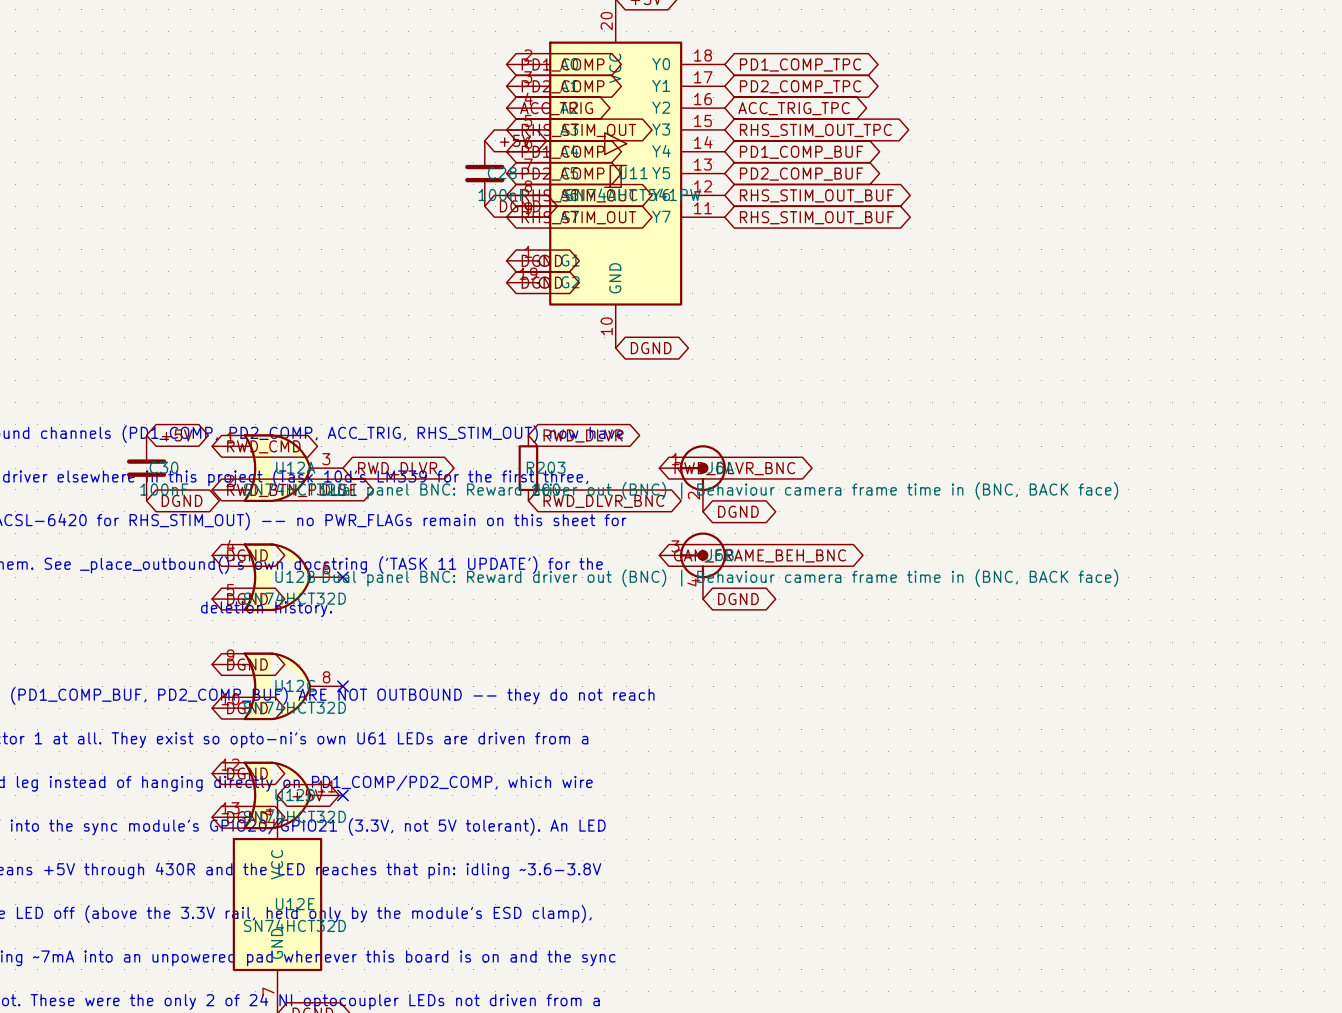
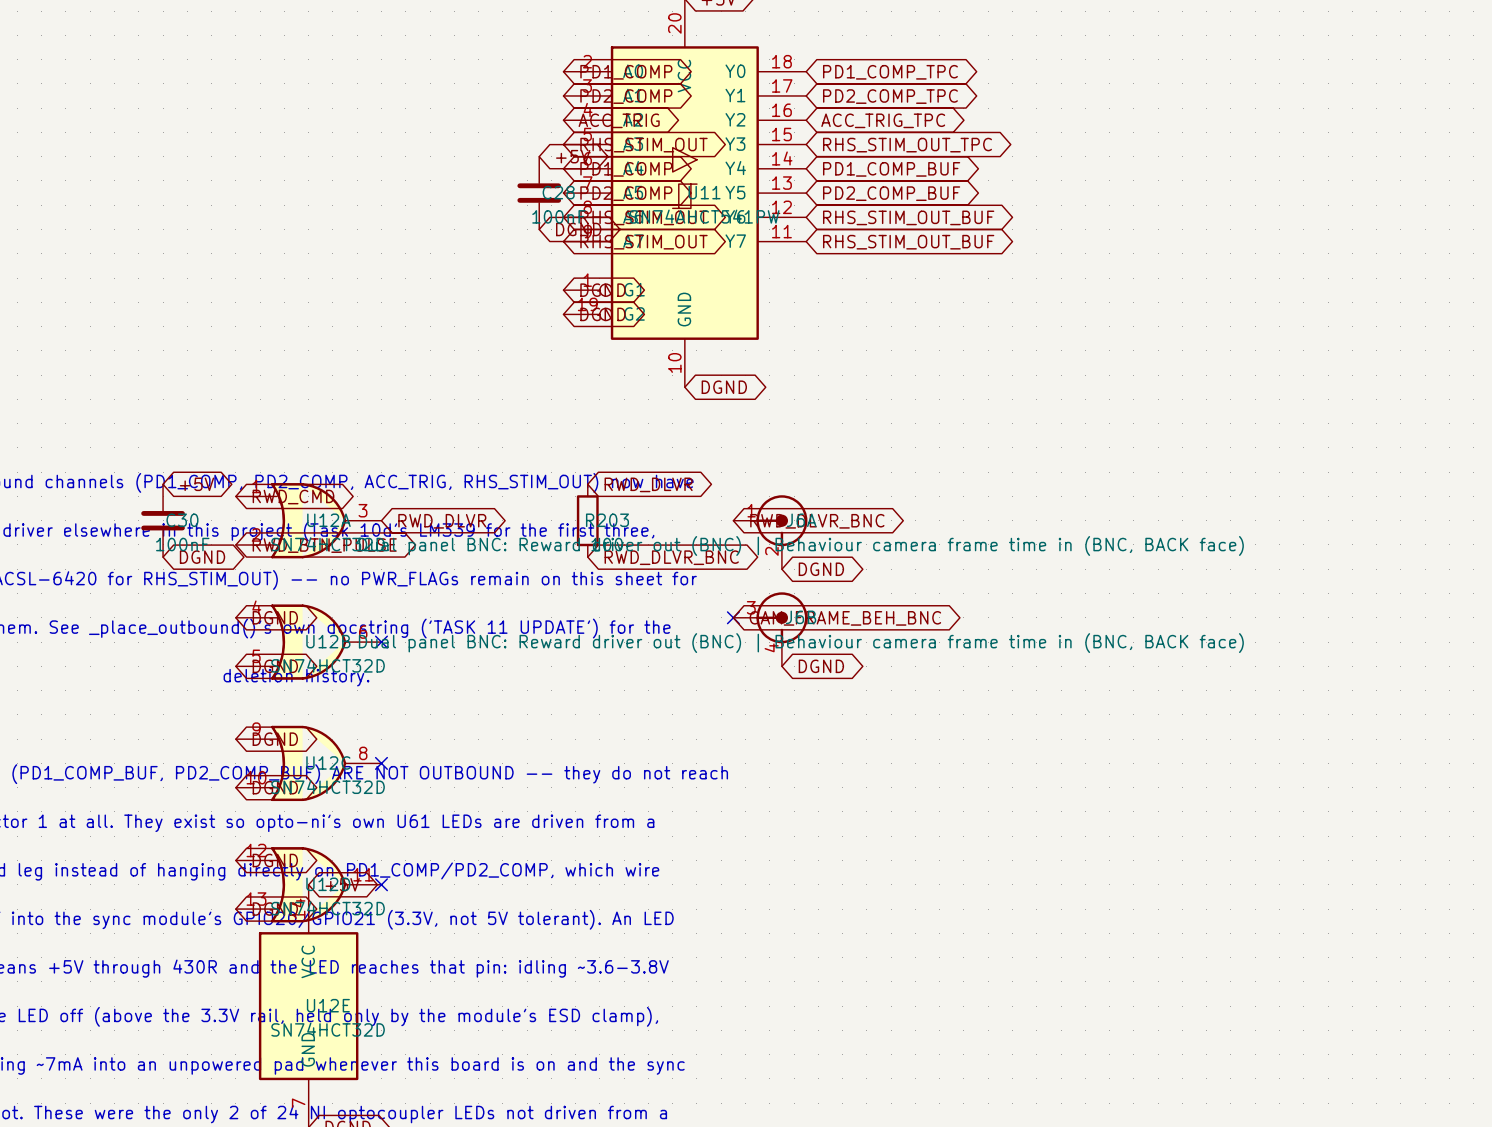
no-connect mark: none -> (733, 617)

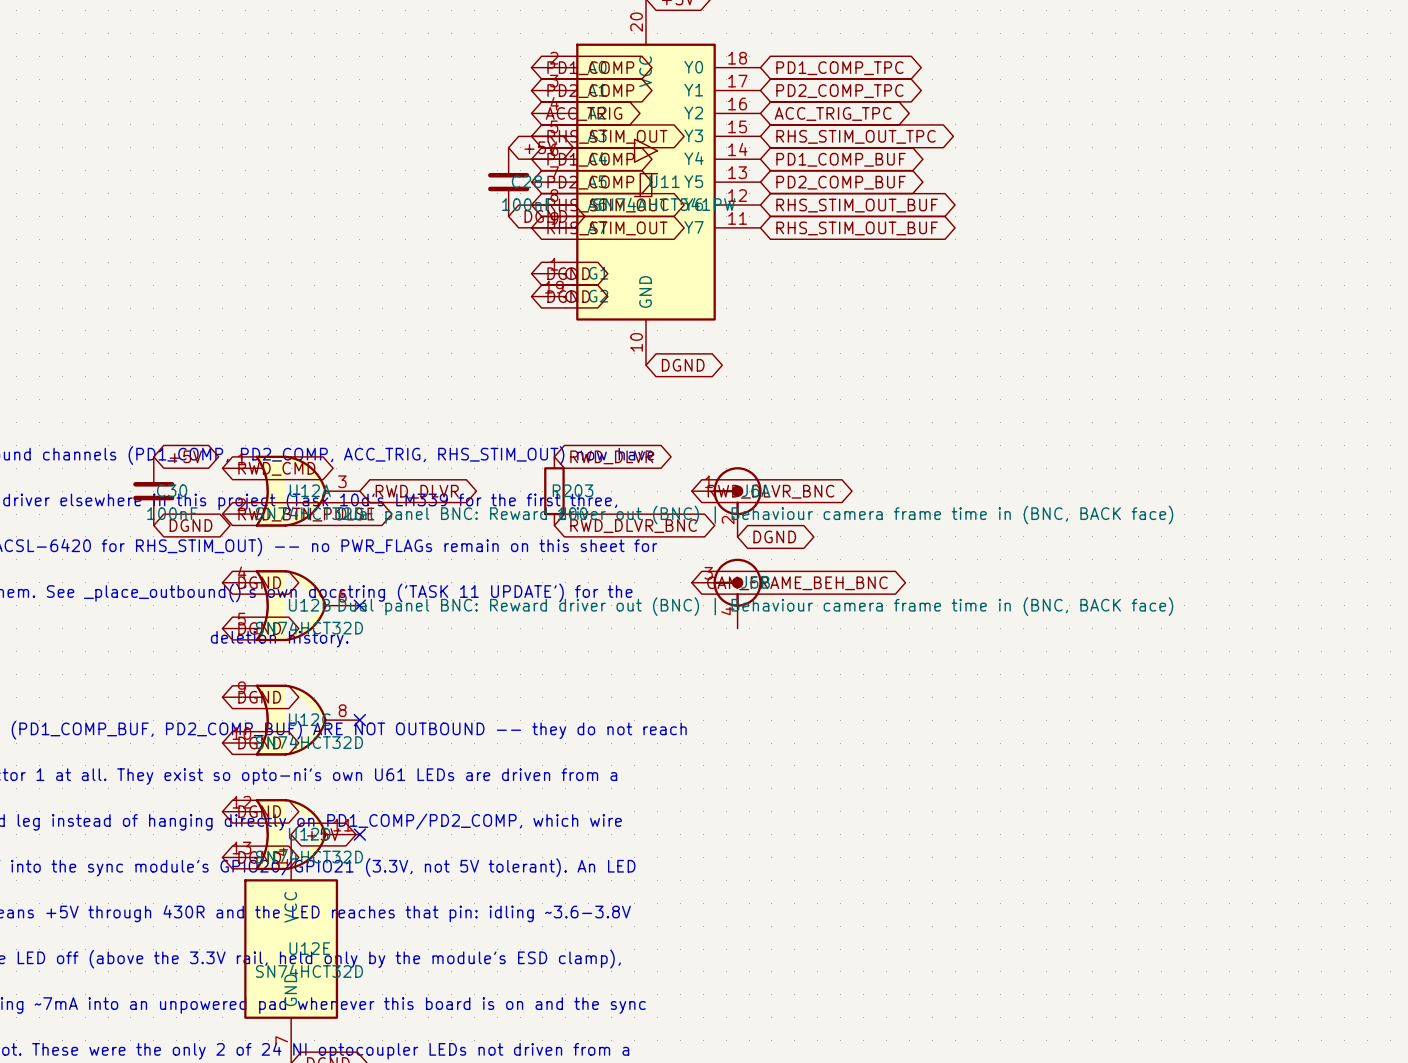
no-connect mark: (733, 617) -> none
global label: DGND (821, 666) -> none

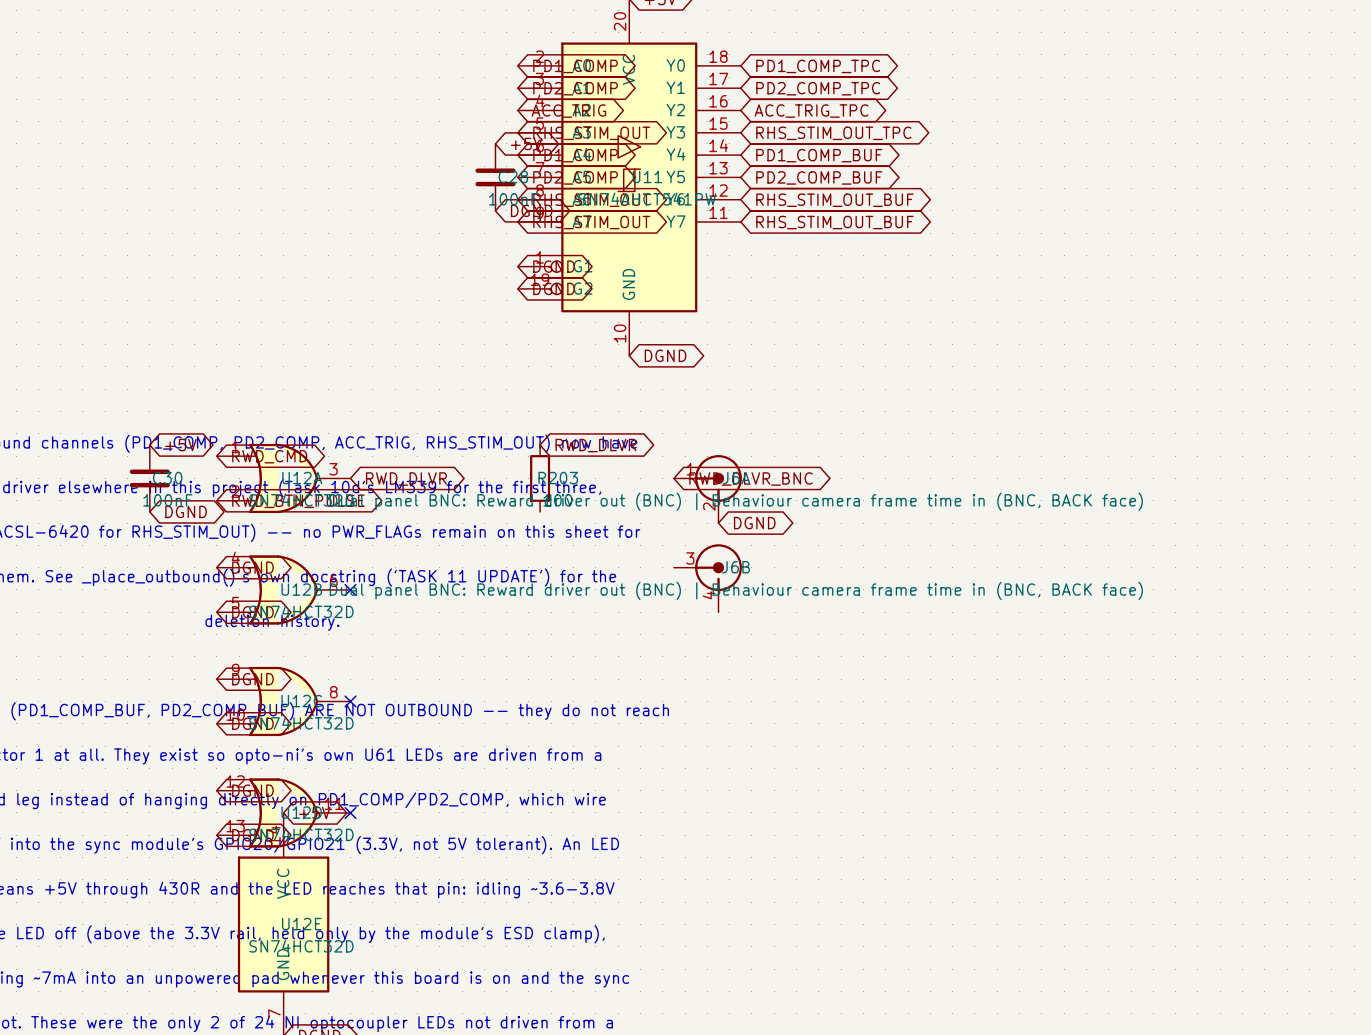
global label: RWD_DLVR_BNC (633, 526) -> none
global label: CAM_FRAME_BEH_BNC (797, 583) -> none

